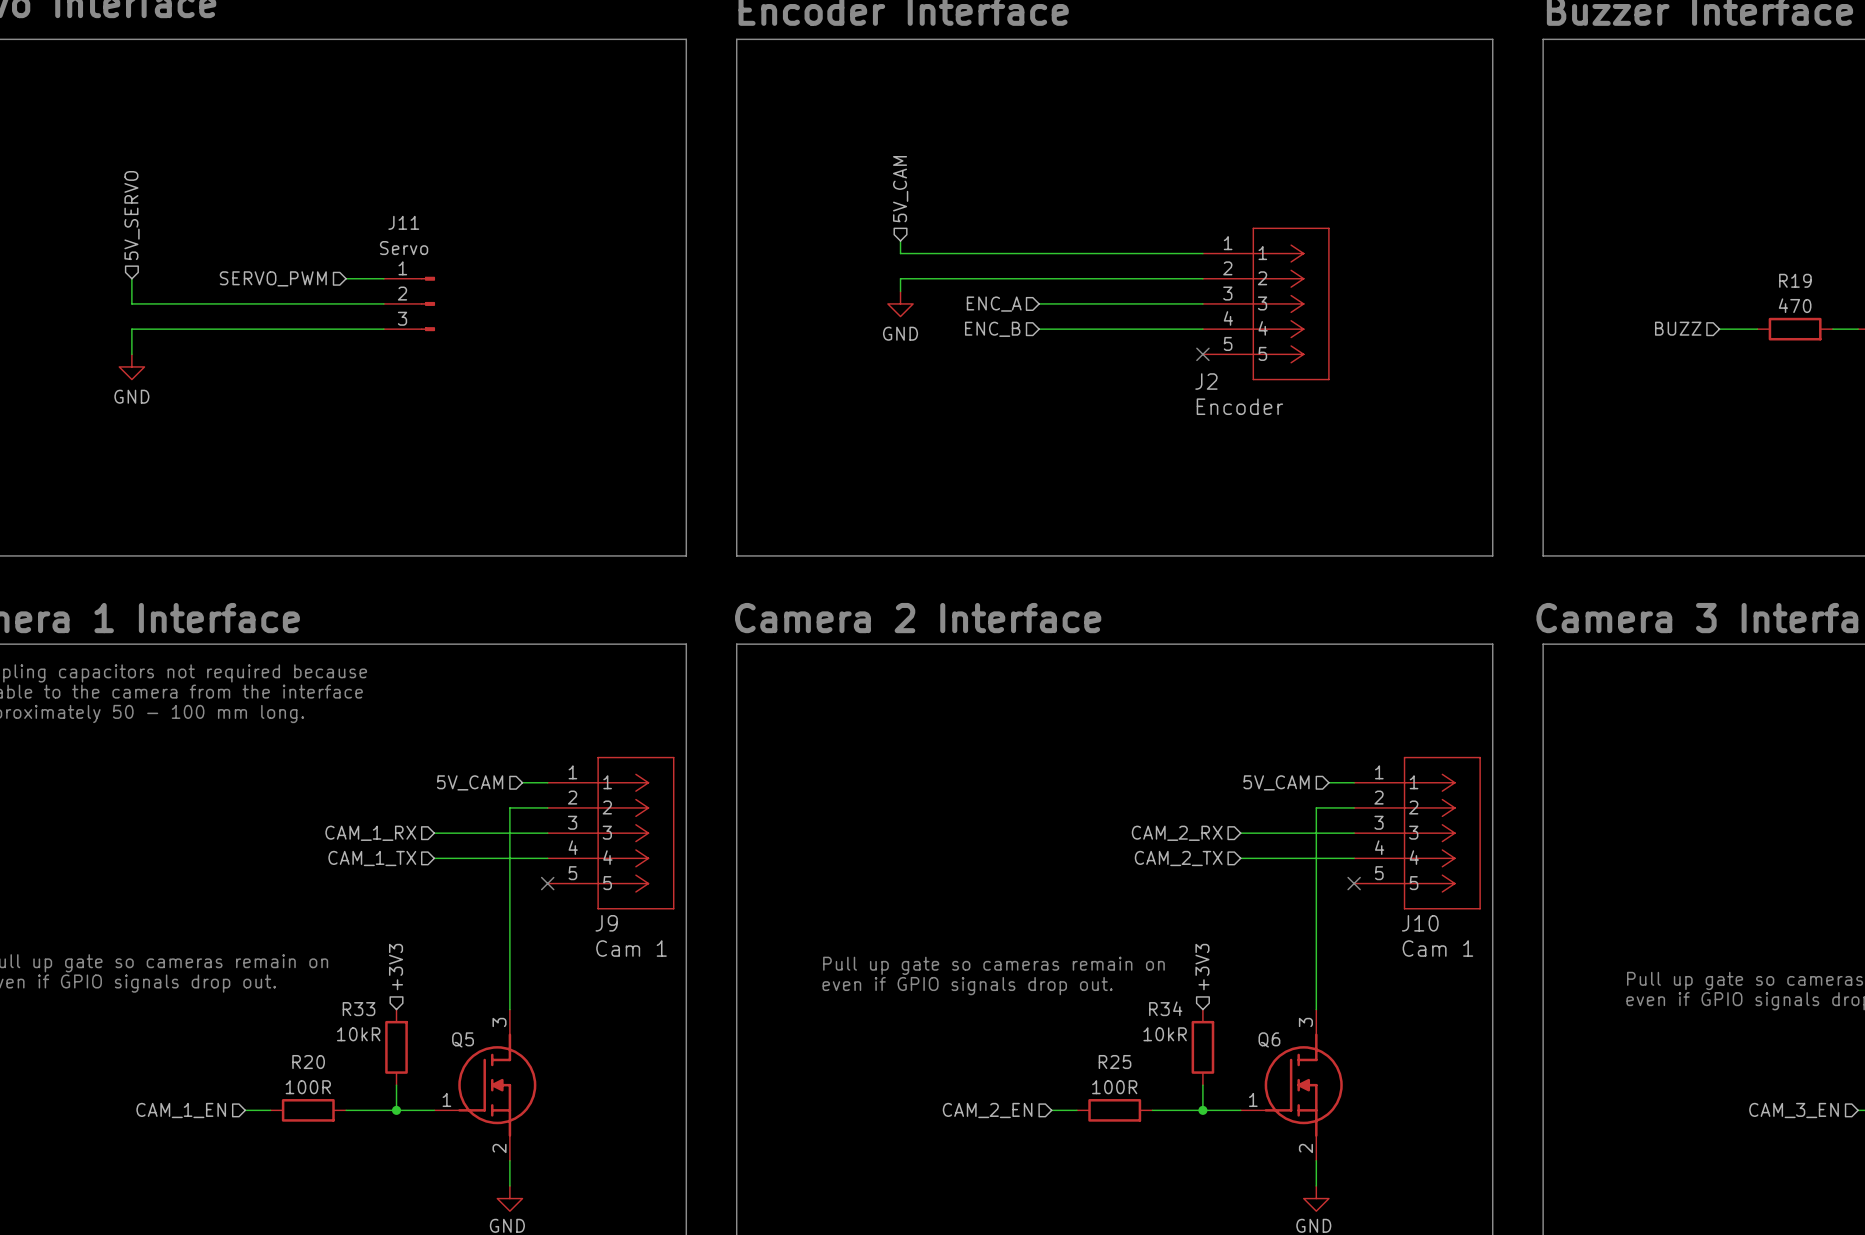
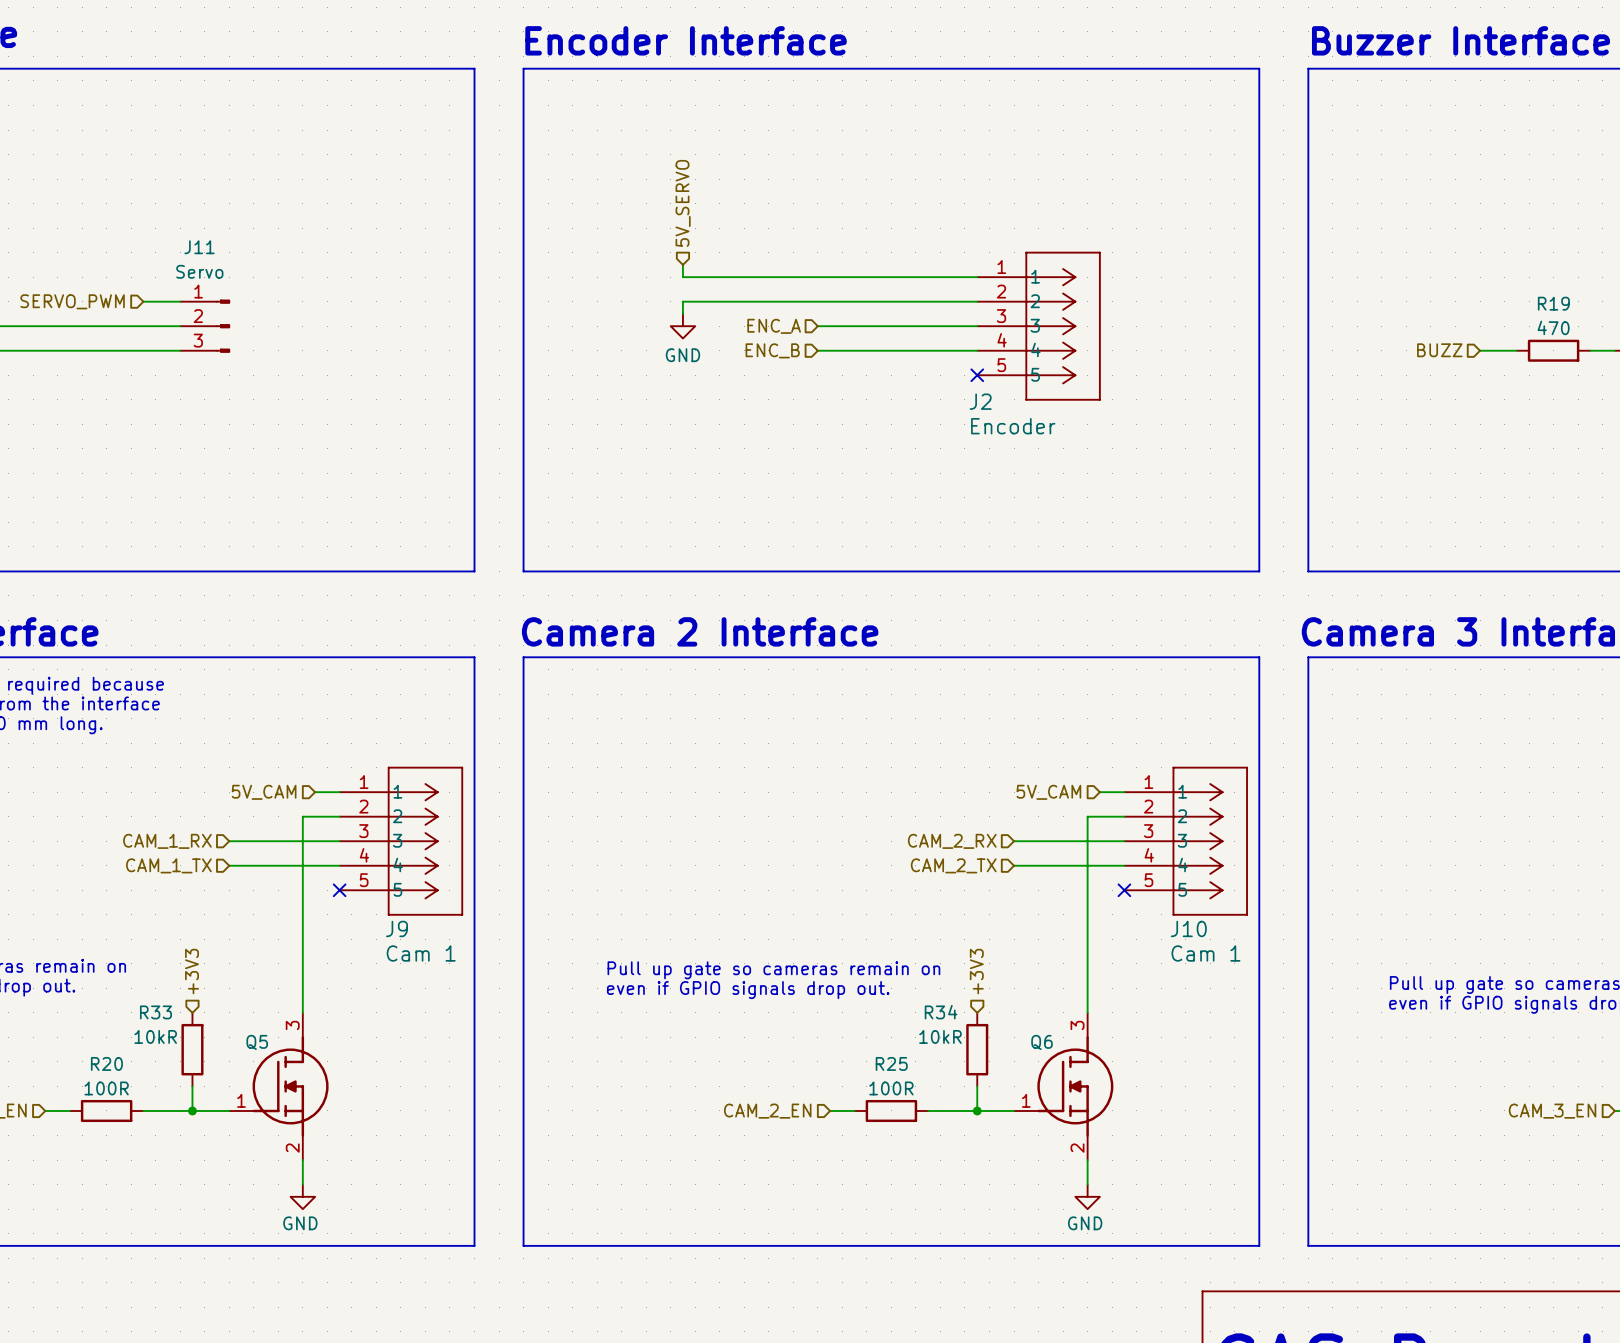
hierarchical label: 5V_CAM (900, 189) -> 5V_SERVO (683, 203)

